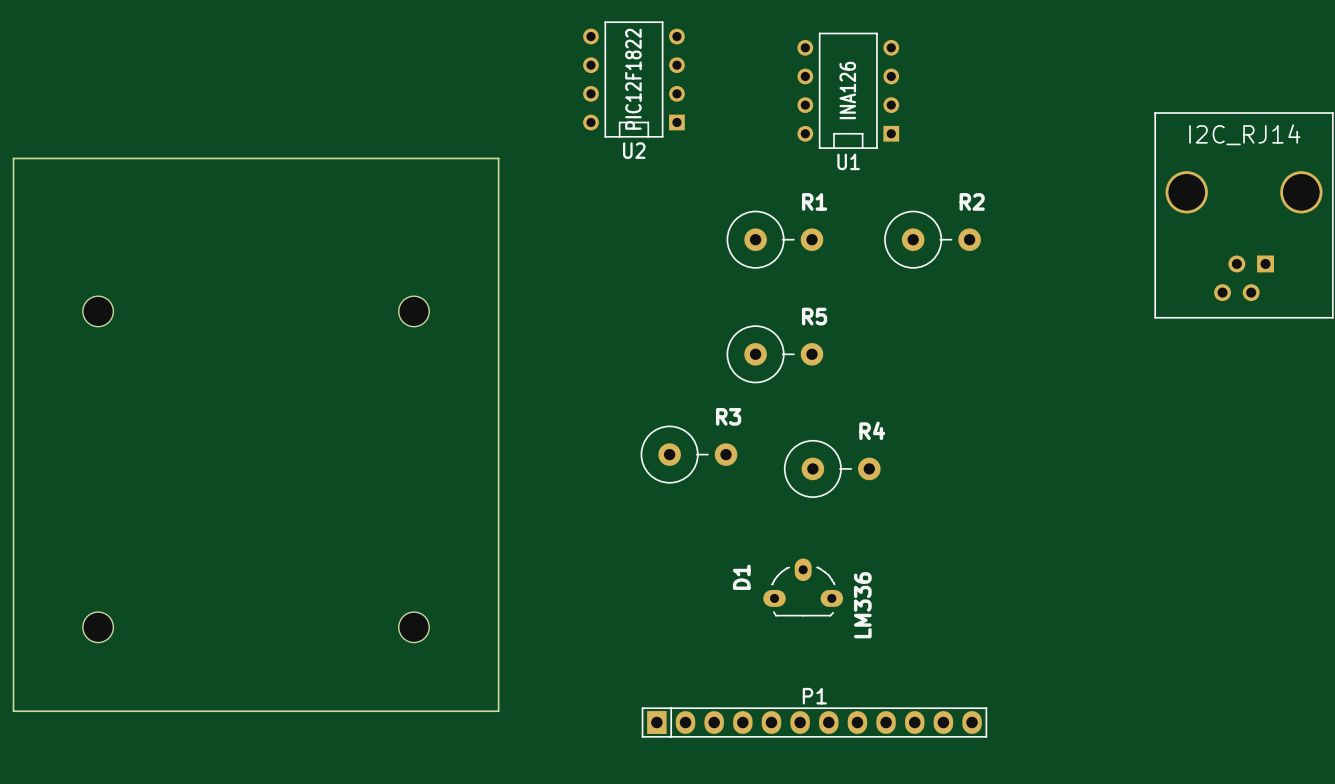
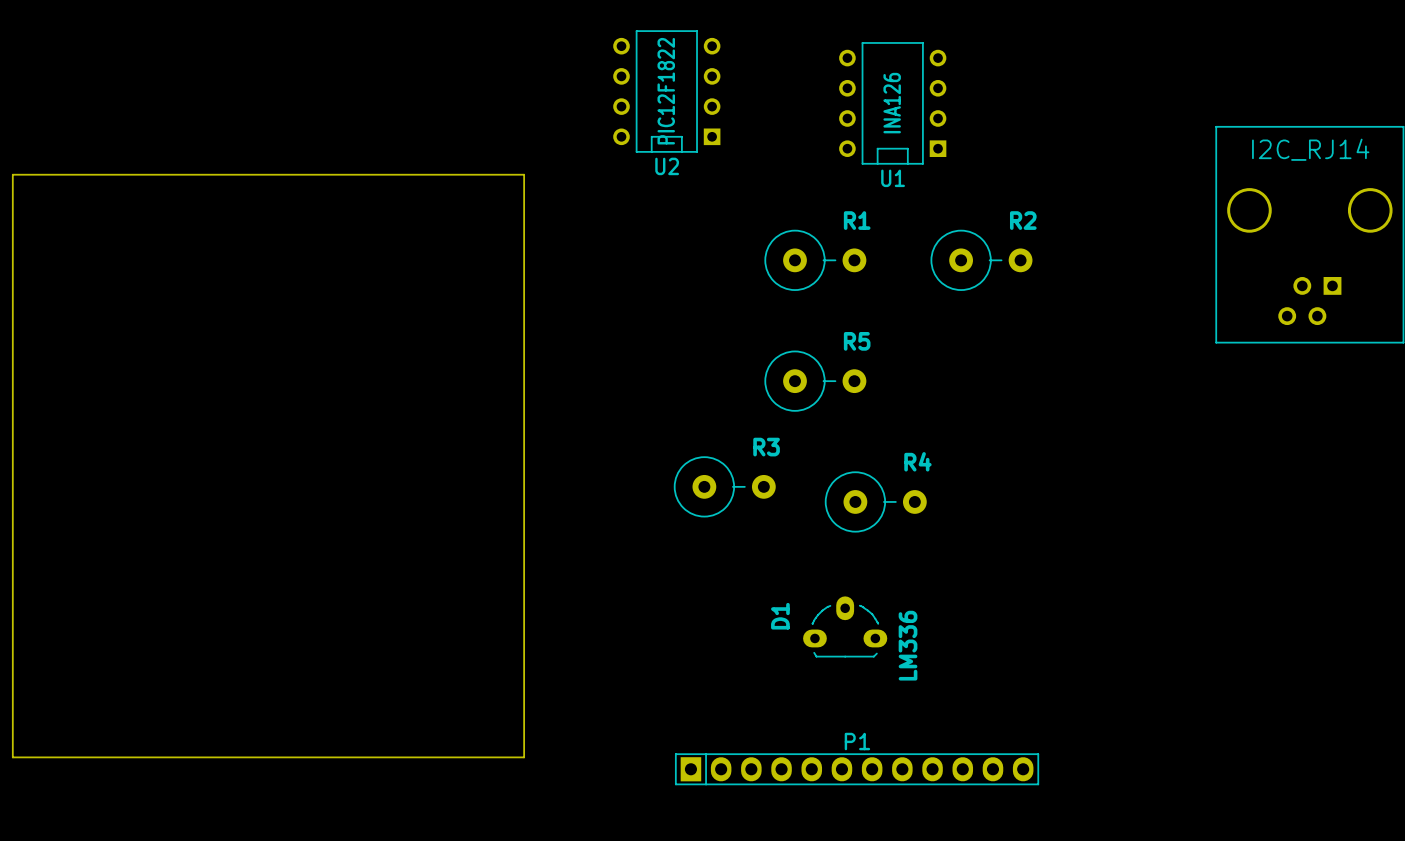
part: (98, 311) -> none
part: (413, 311) -> none
part: (98, 627) -> none
part: (413, 627) -> none

